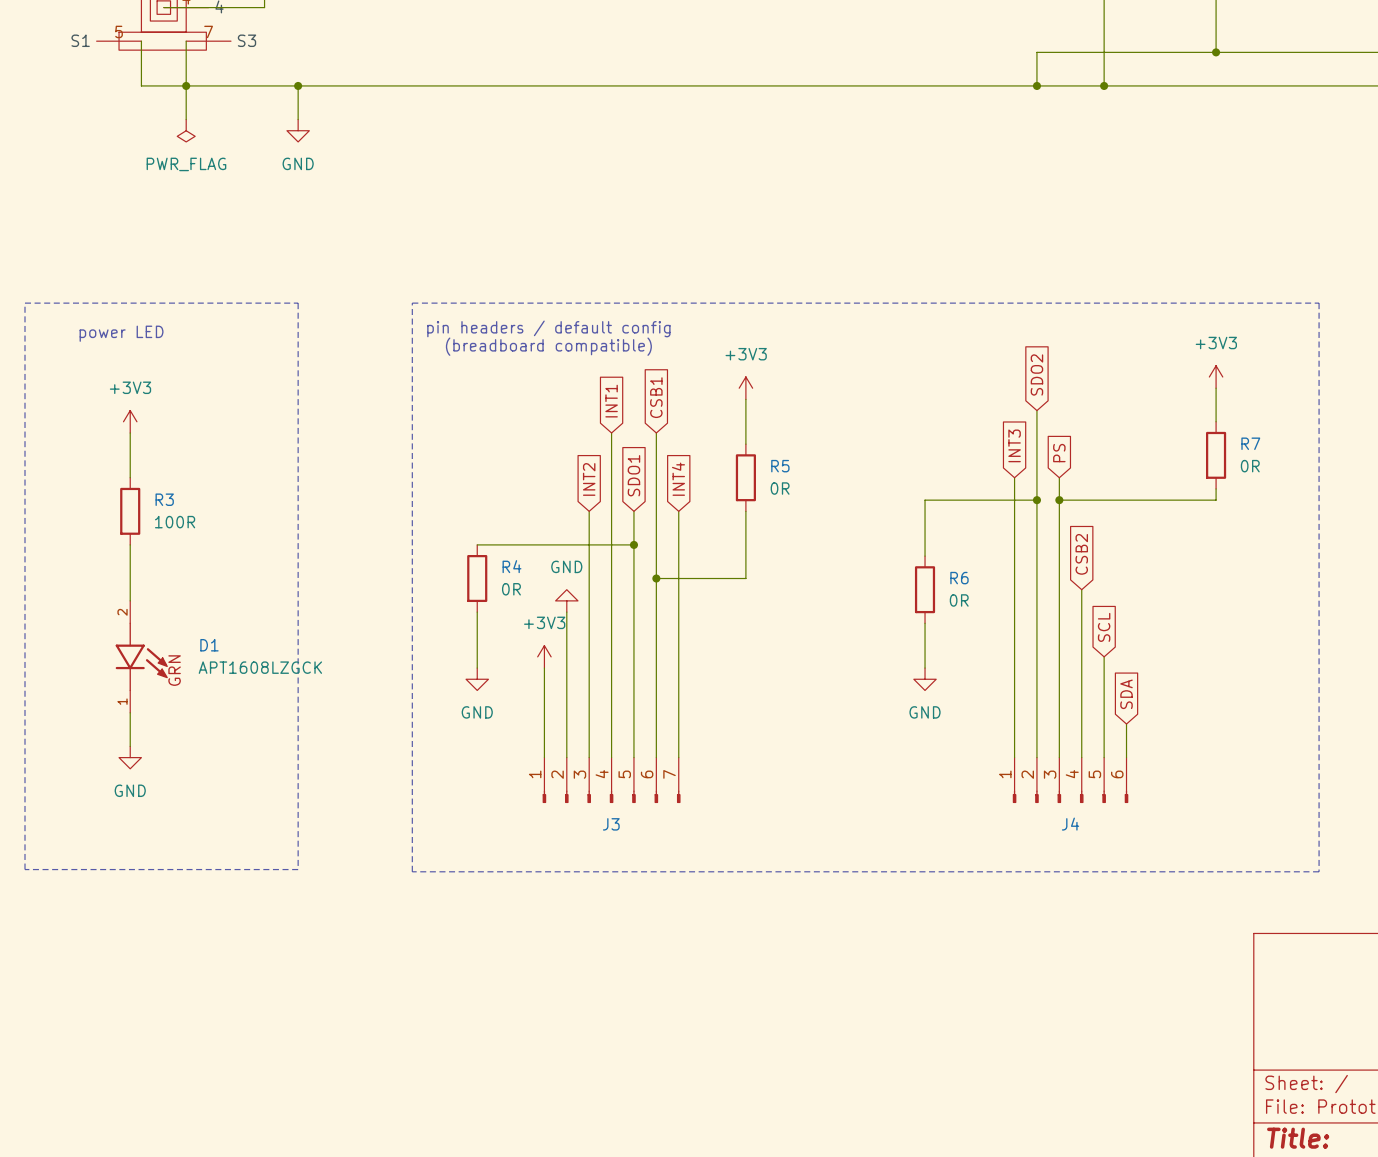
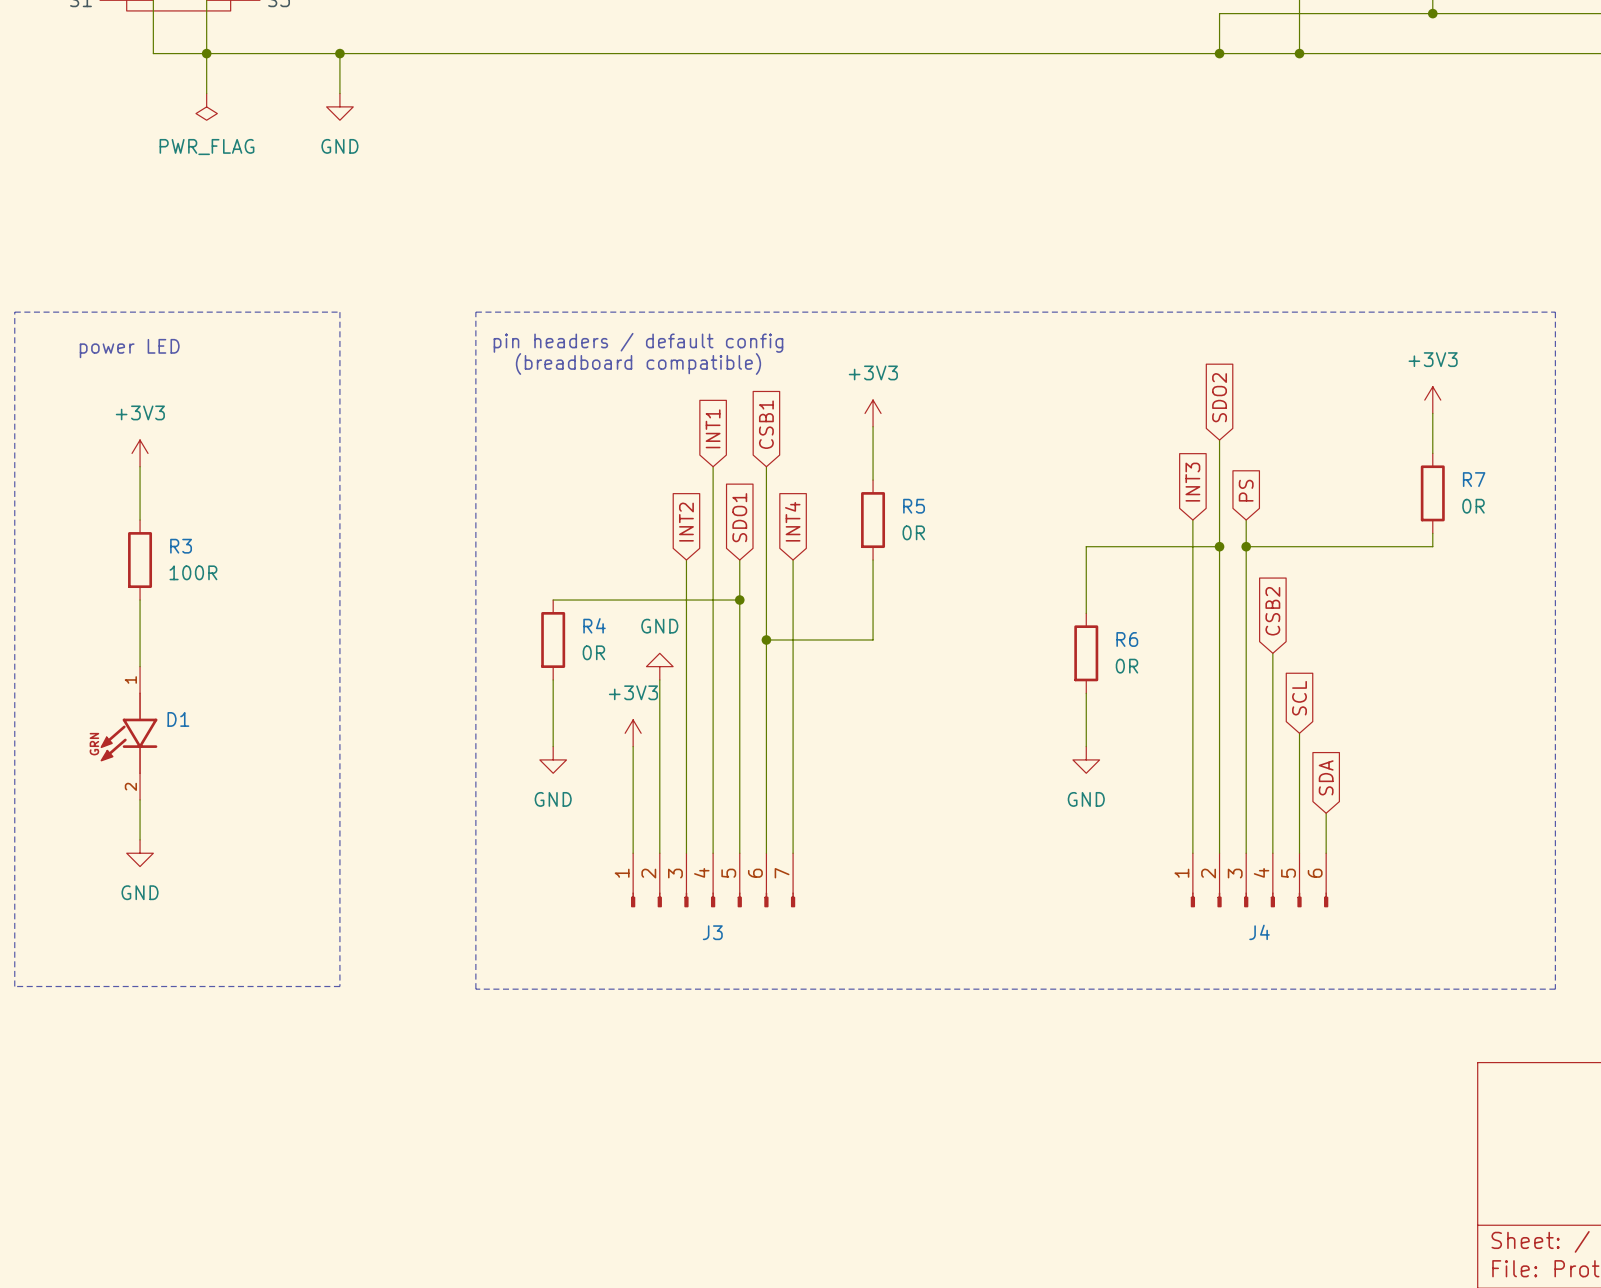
D1 symbol: [115, 600, 168, 713] -> [100, 666, 158, 800]
D1 name position: D1 (209, 645) -> D1 (178, 719)
D1 value: APT1608LZGCK (260, 667) -> none

